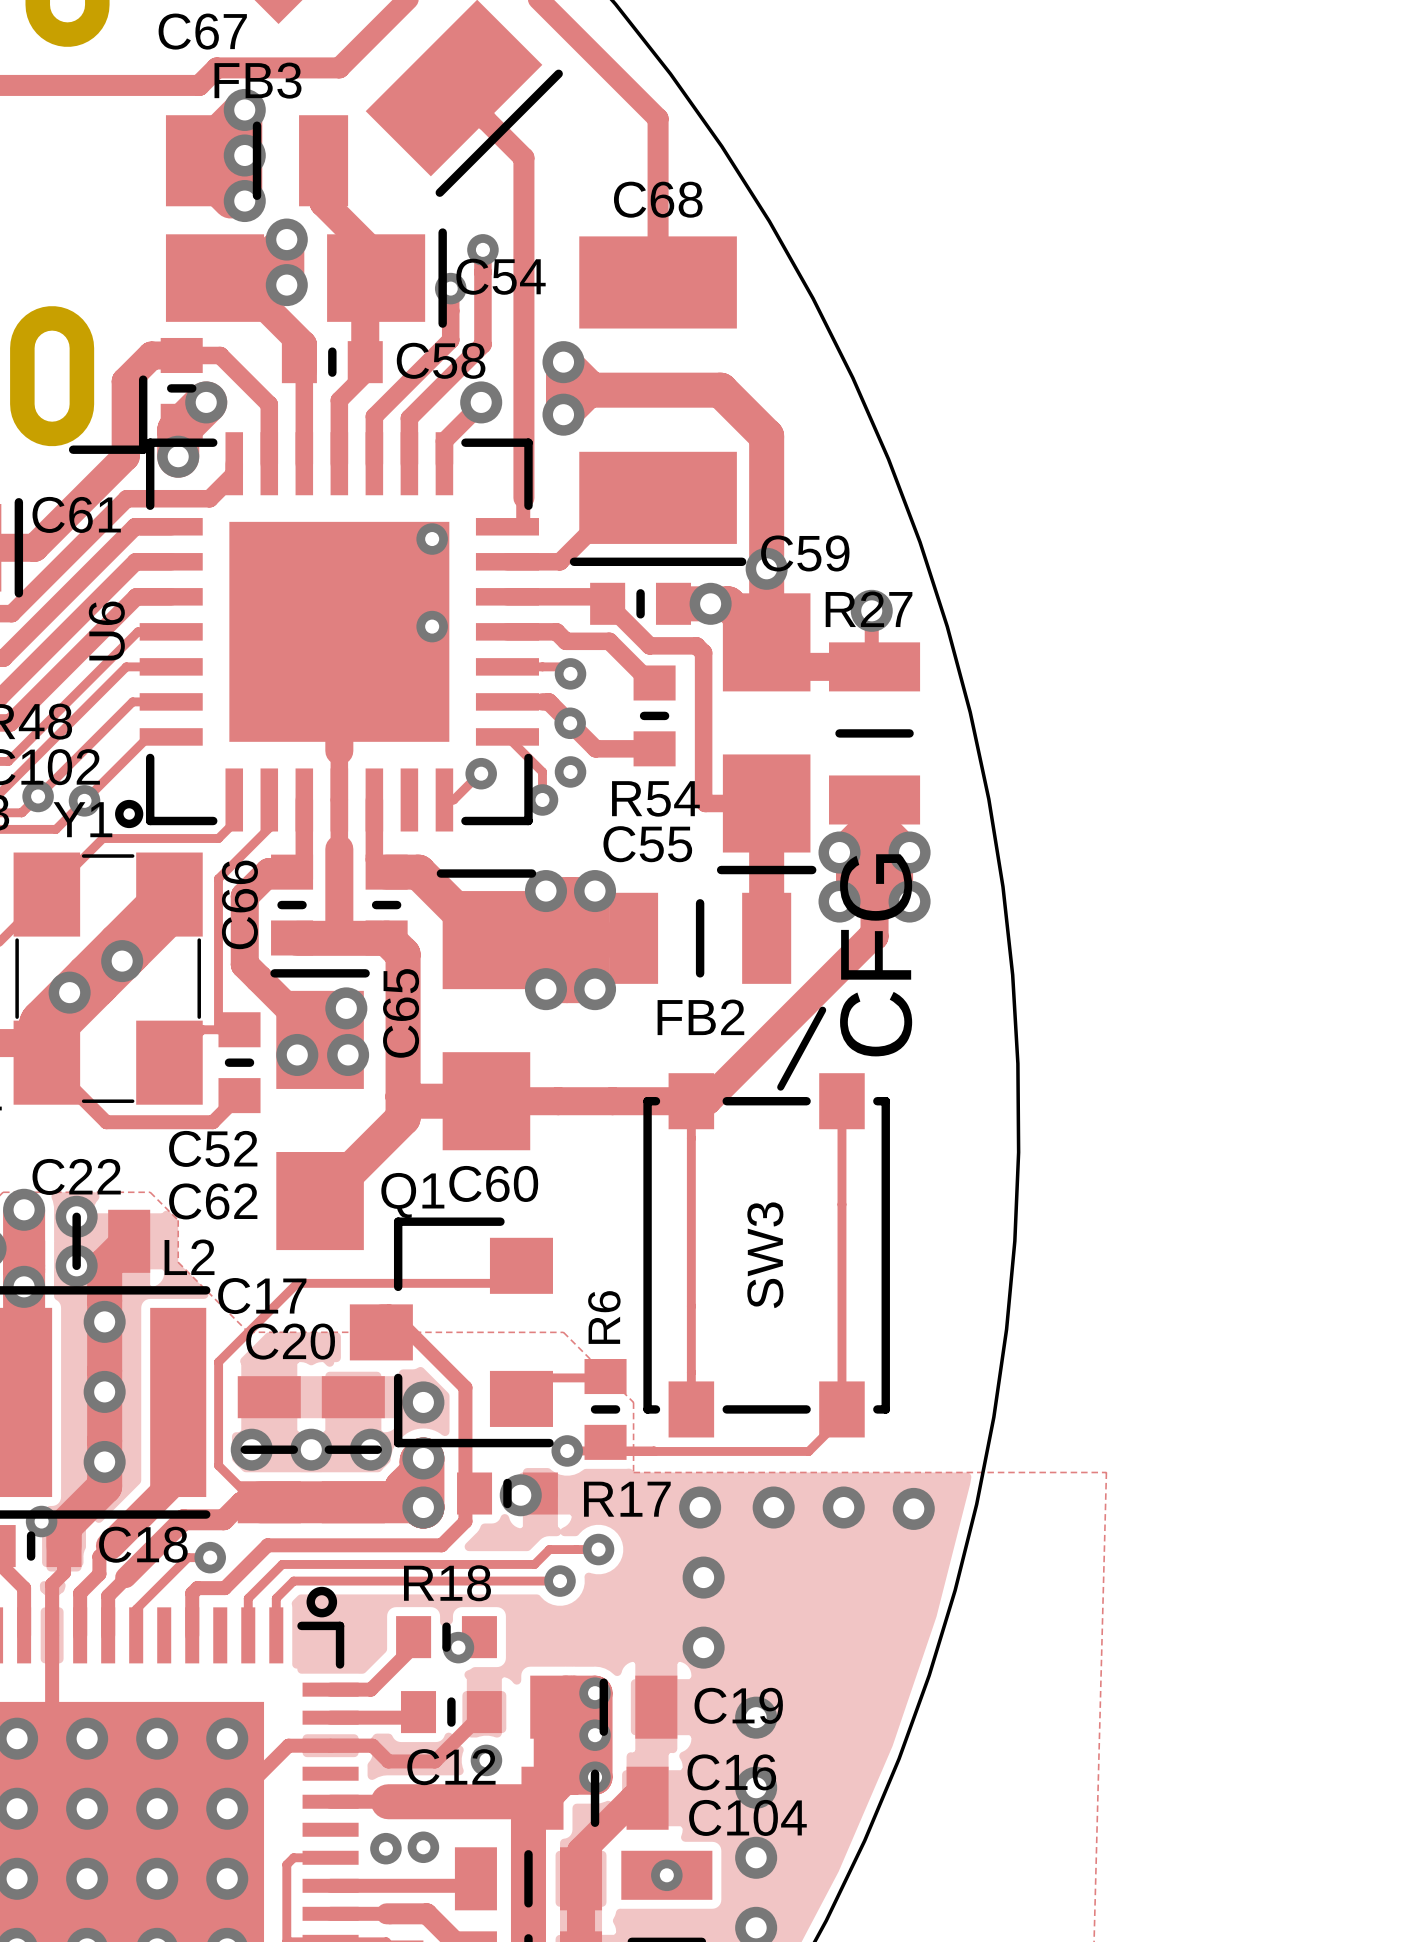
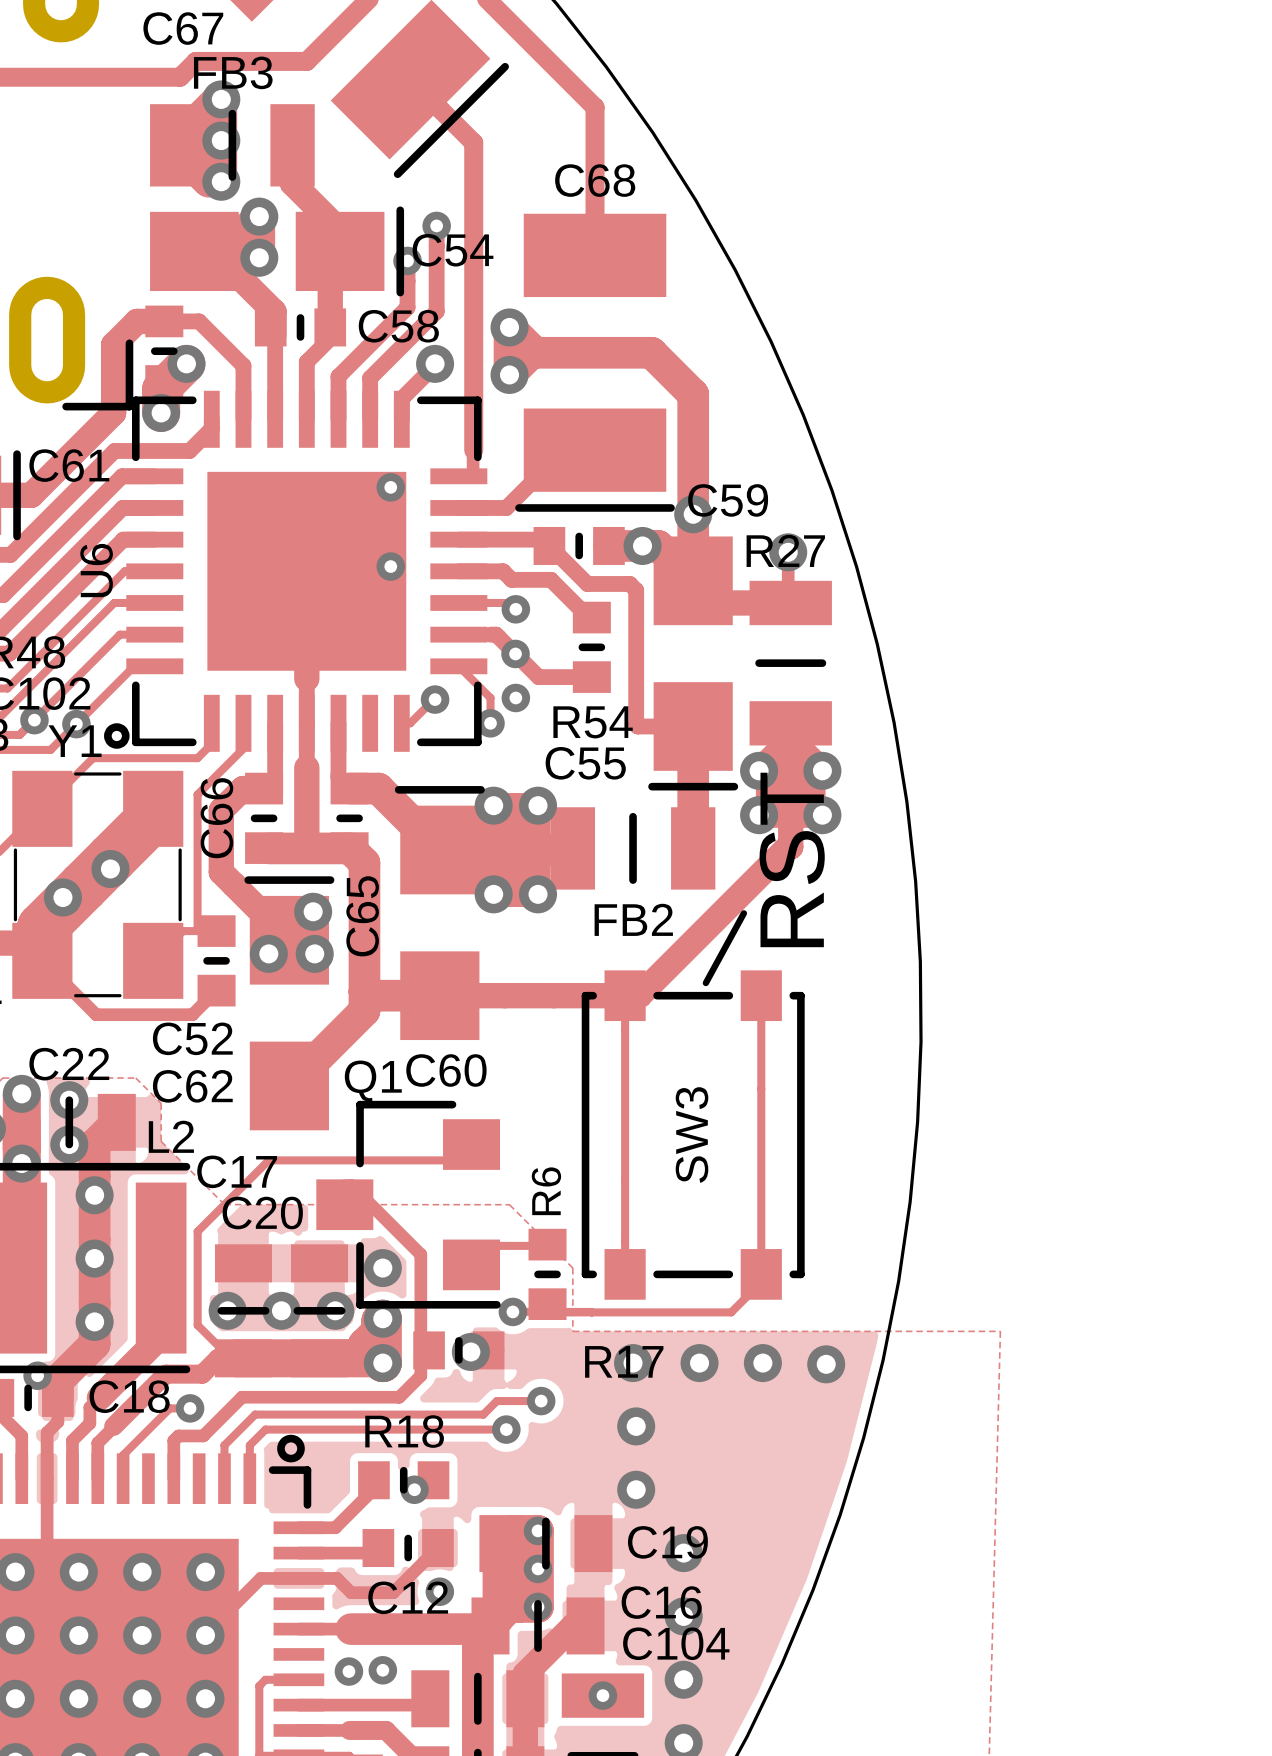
text: CFG (876, 955) -> RST (792, 859)
R17 name position: R17 (627, 1499) -> R17 (624, 1361)

